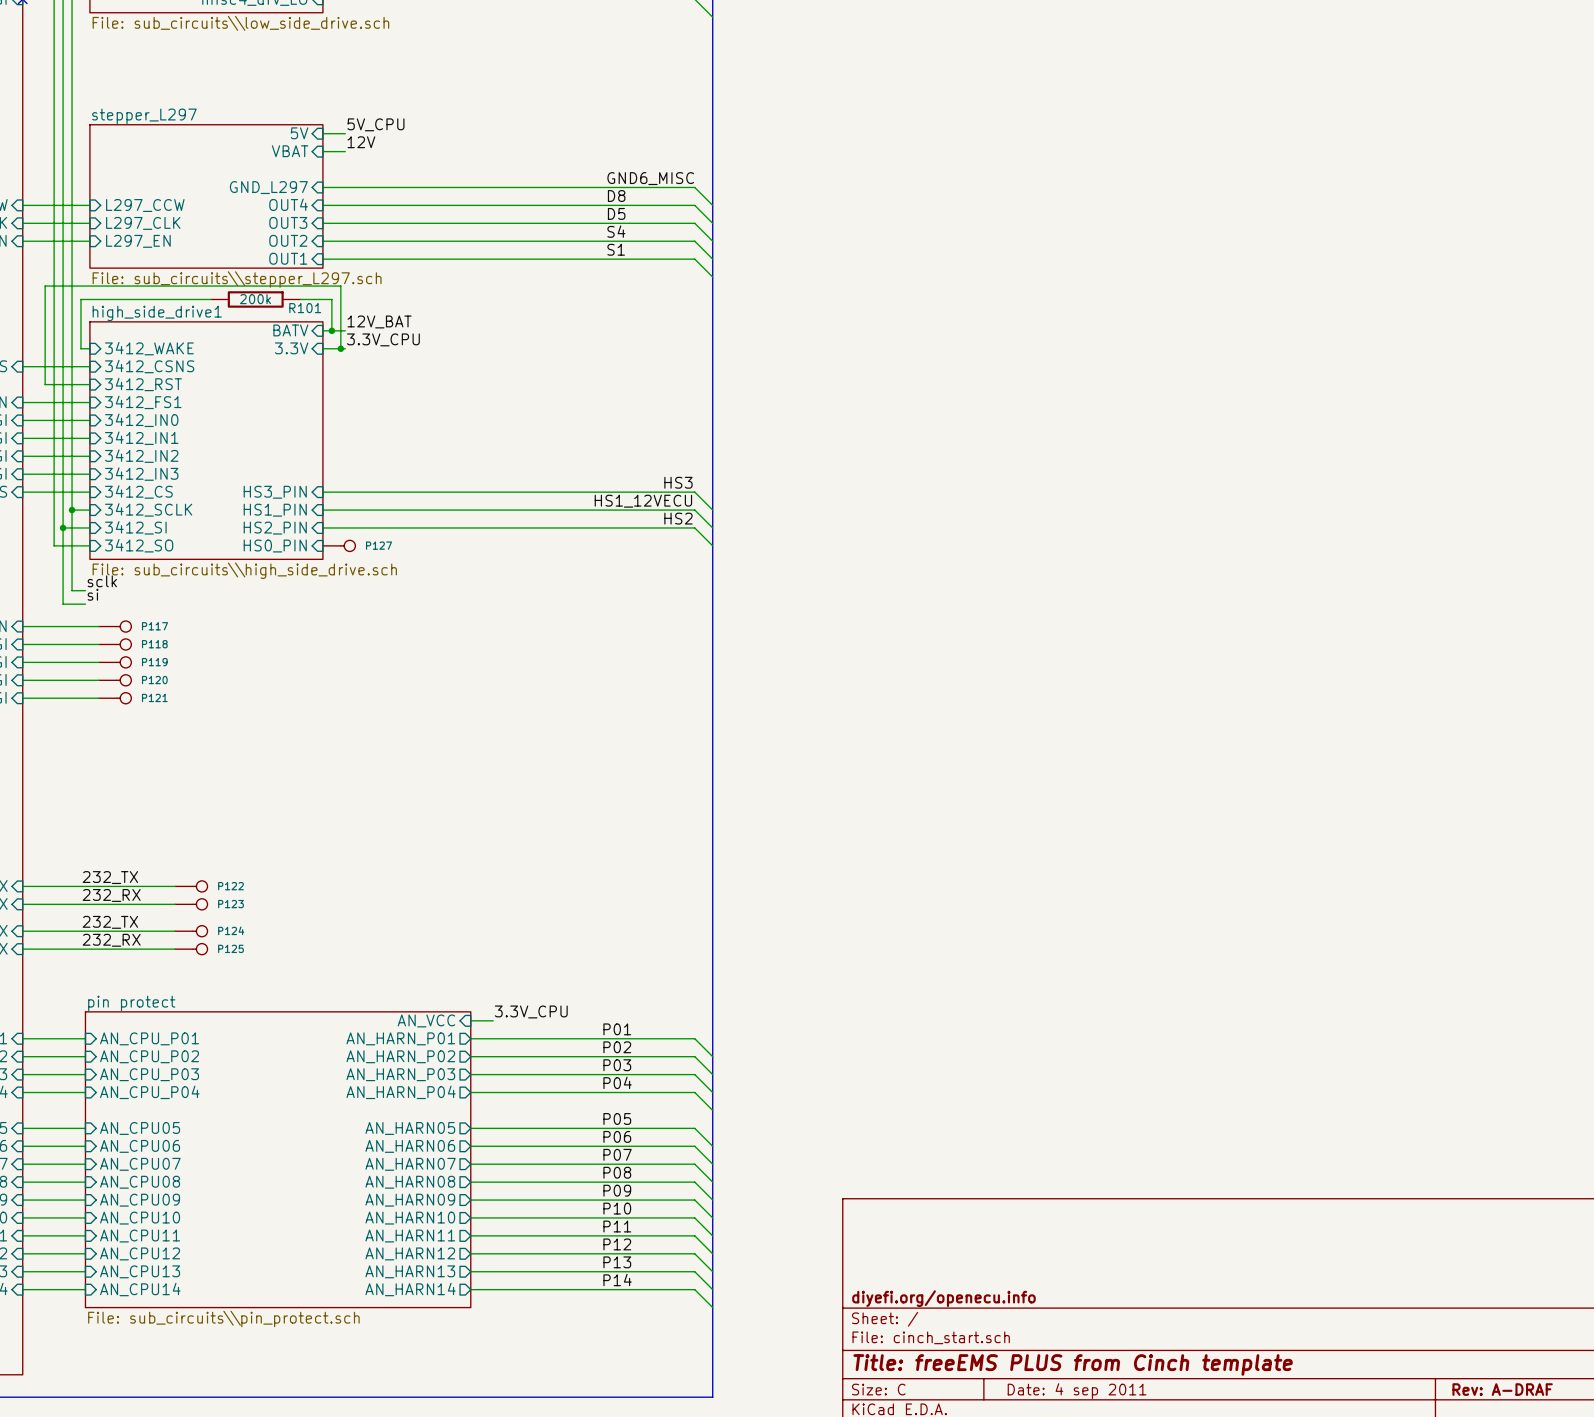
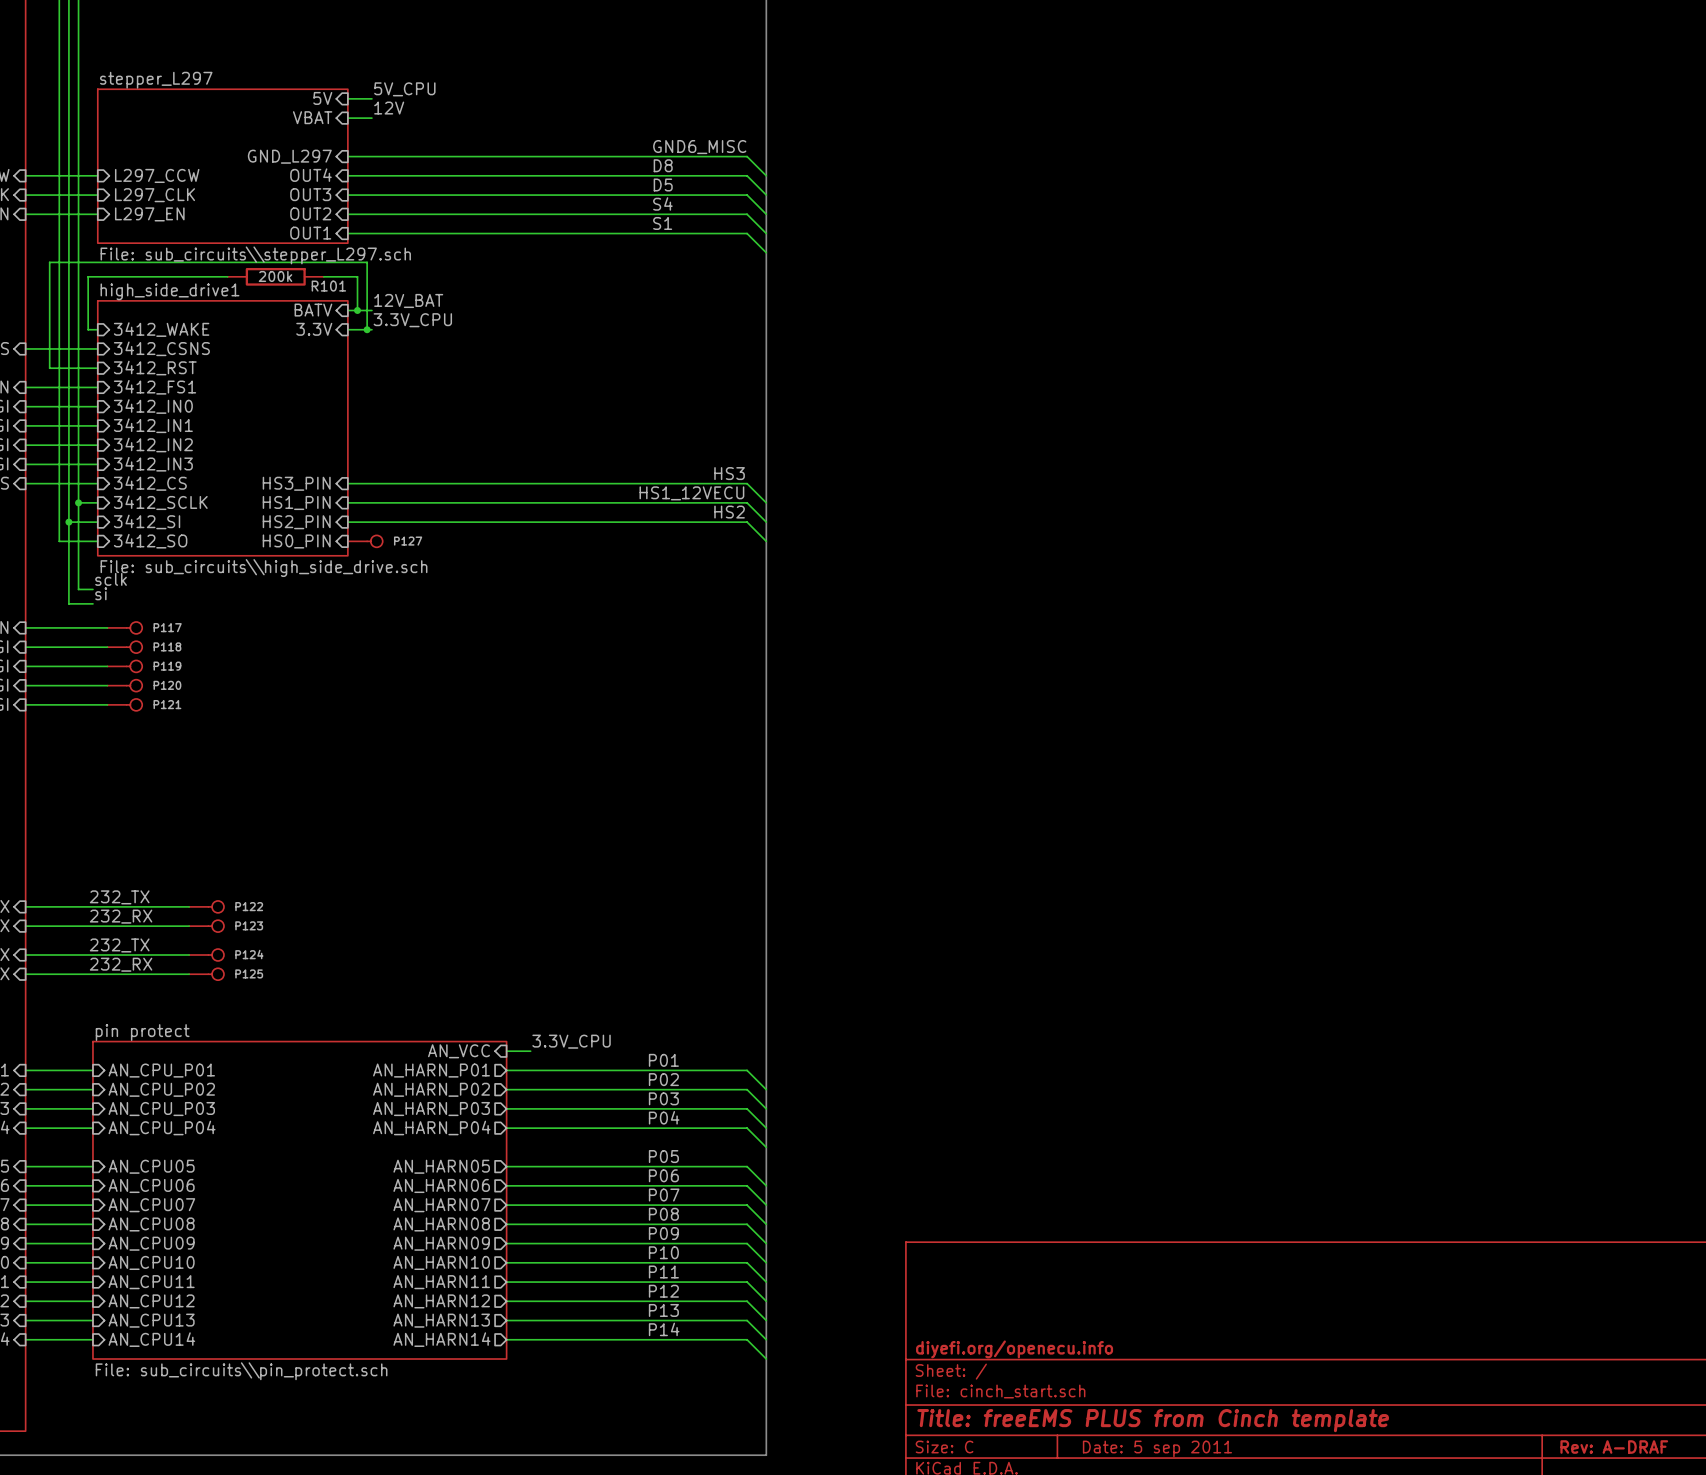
title block: Date: 4 sep 2011 (1077, 1391) -> Date: 5 sep 2011 (1157, 1448)

